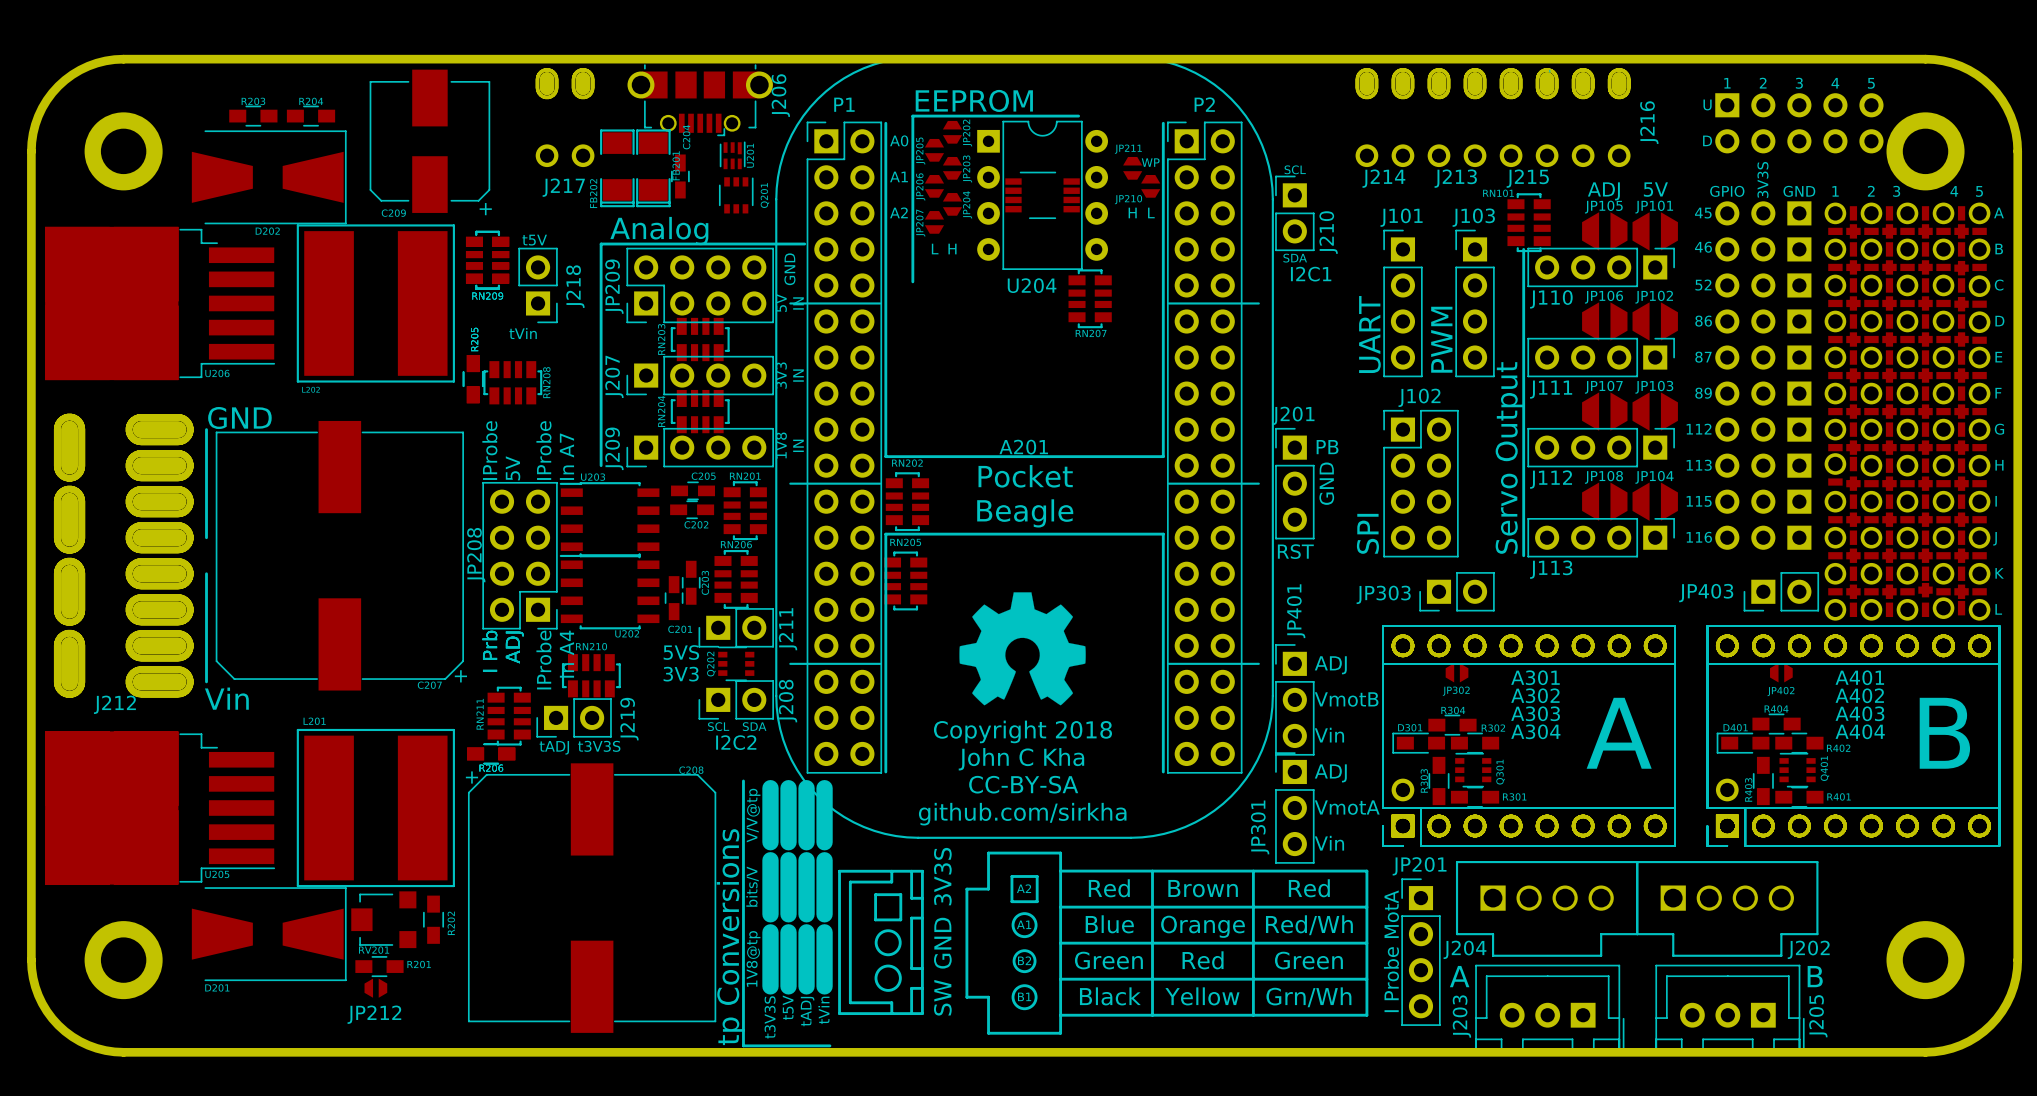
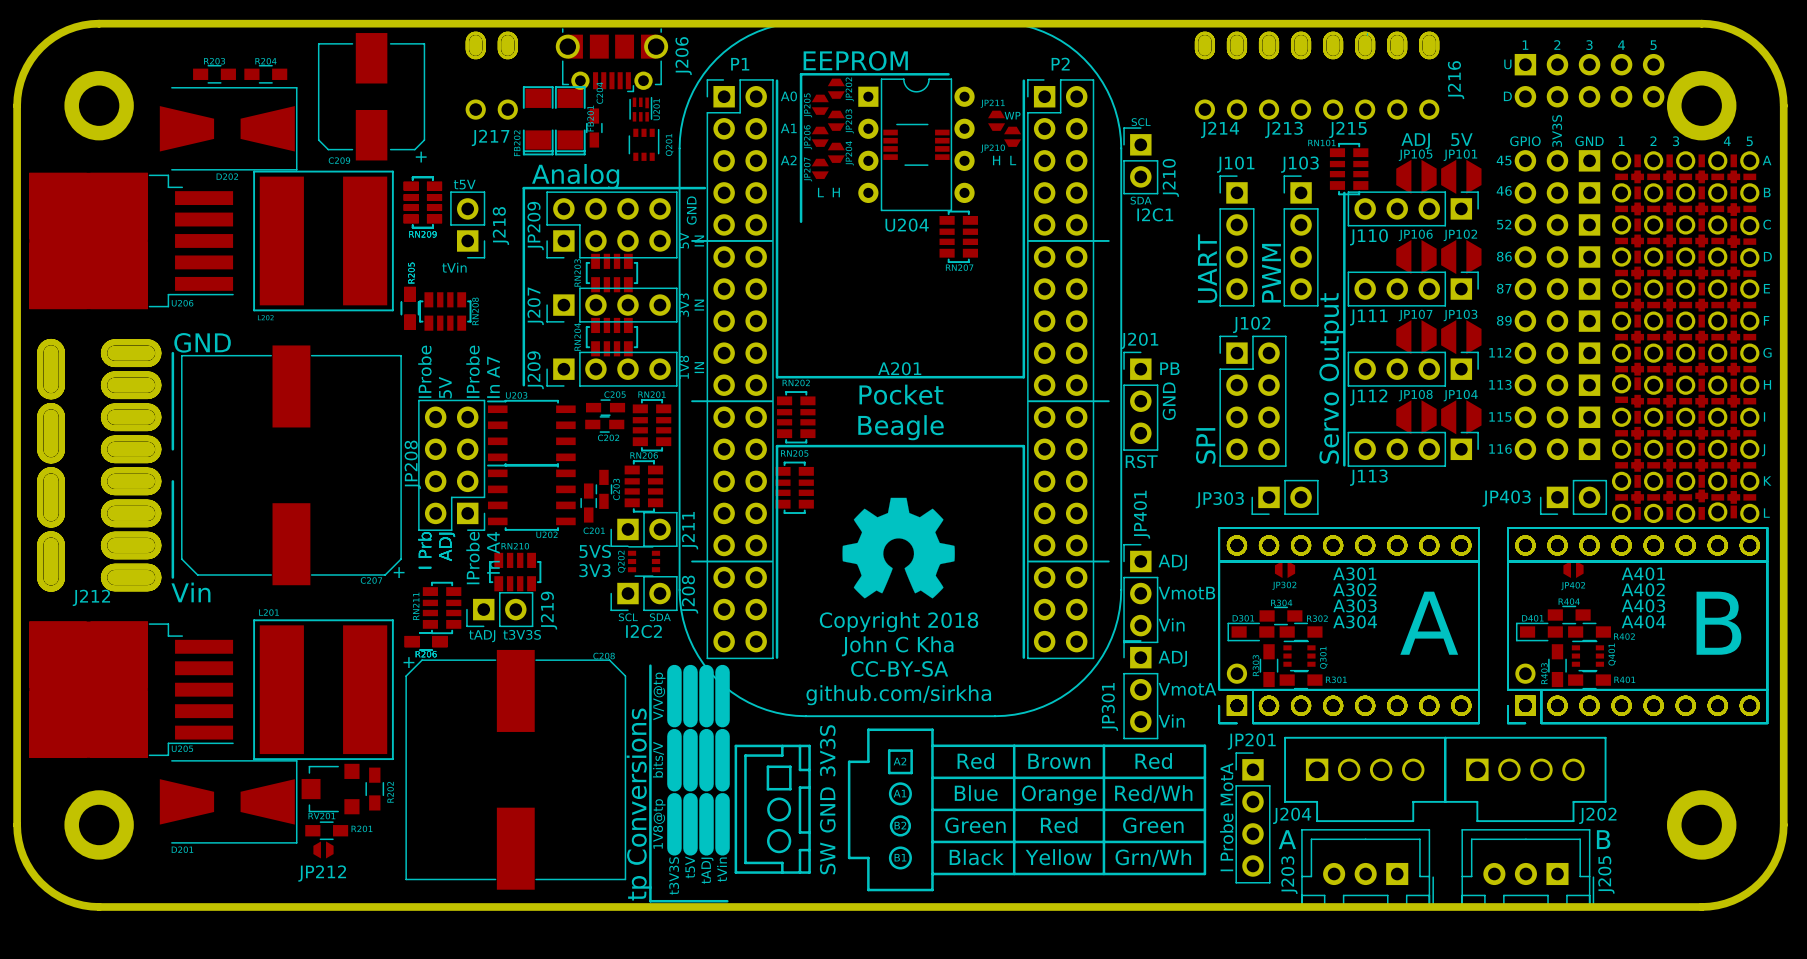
J206 footprint: [627, 64, 773, 137] -> [555, 28, 669, 93]

